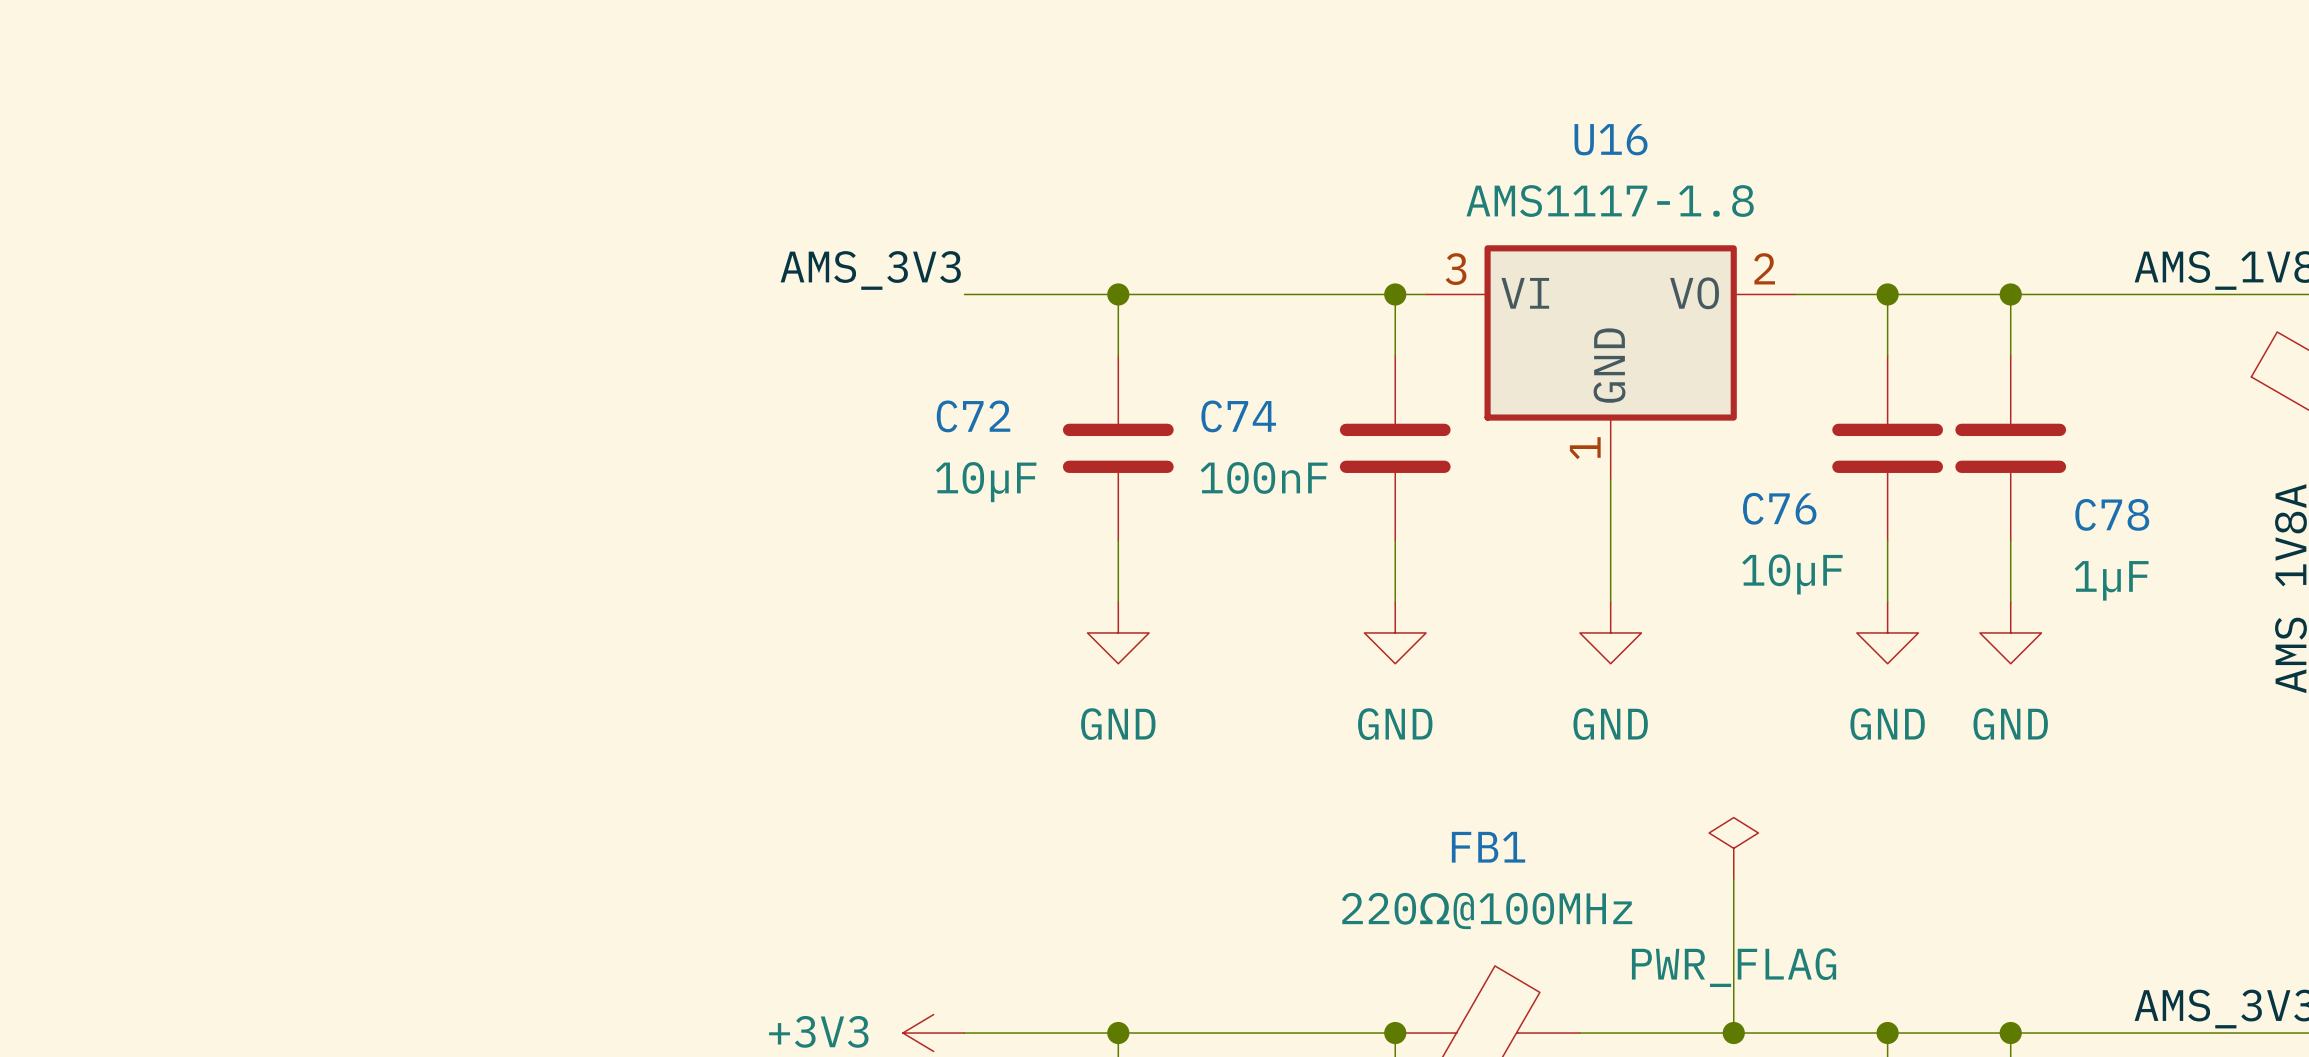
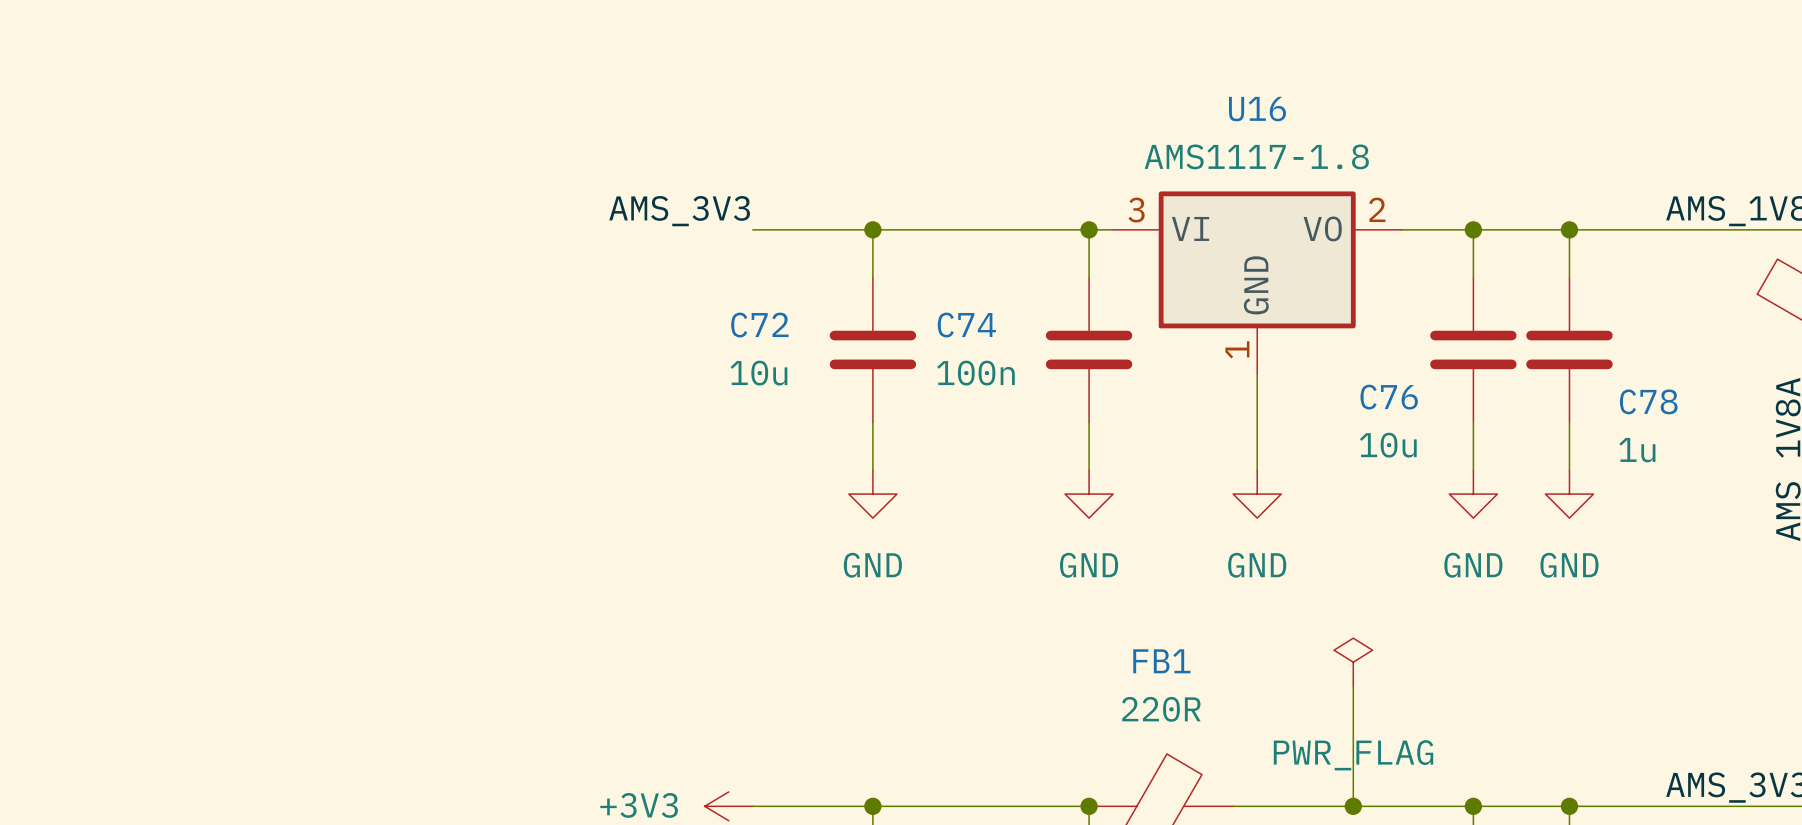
C74 value: 100nF (1264, 477) -> 100n (975, 373)
C72 value: 10µF (986, 482) -> 10u (758, 373)
C76 value: 10µF (1792, 574) -> 10u (1388, 445)
C78 value: 1µF (2111, 580) -> 1u (1637, 450)
FB1 value: 220Ω@100MHz (1487, 910) -> 220R (1161, 709)

